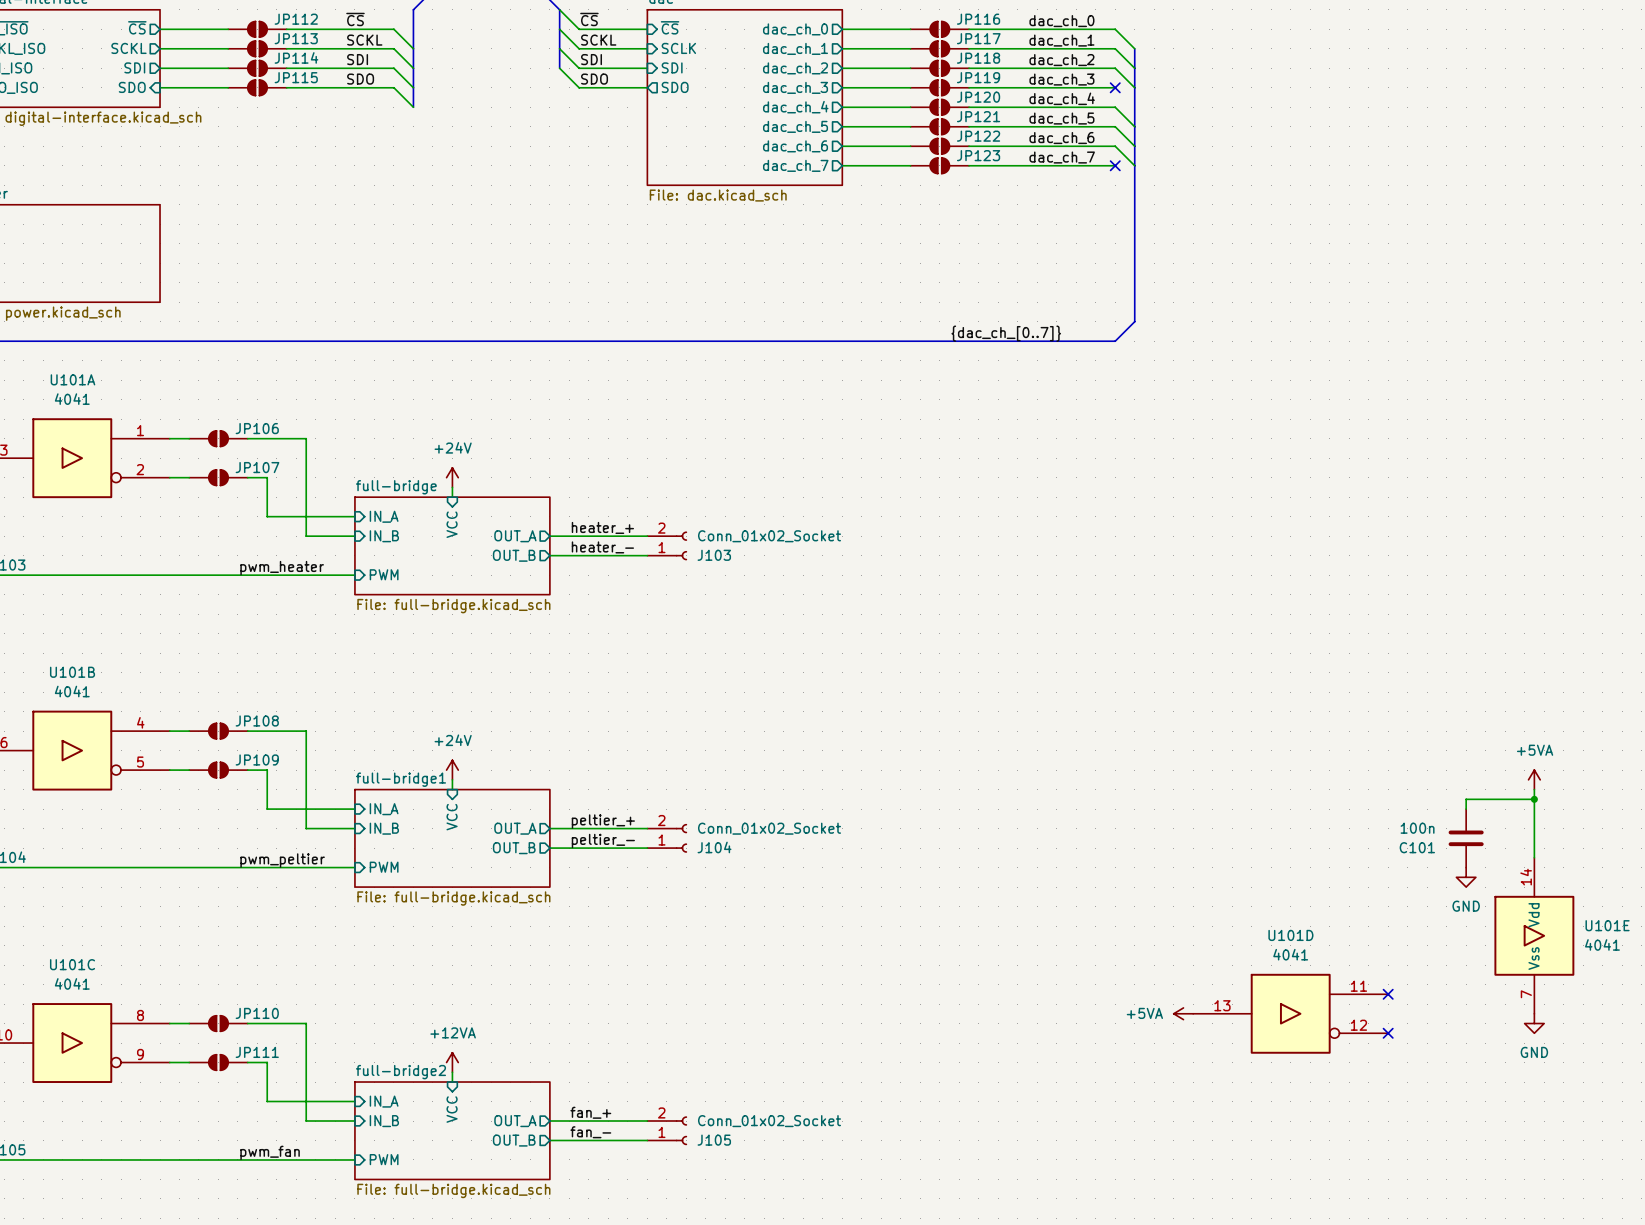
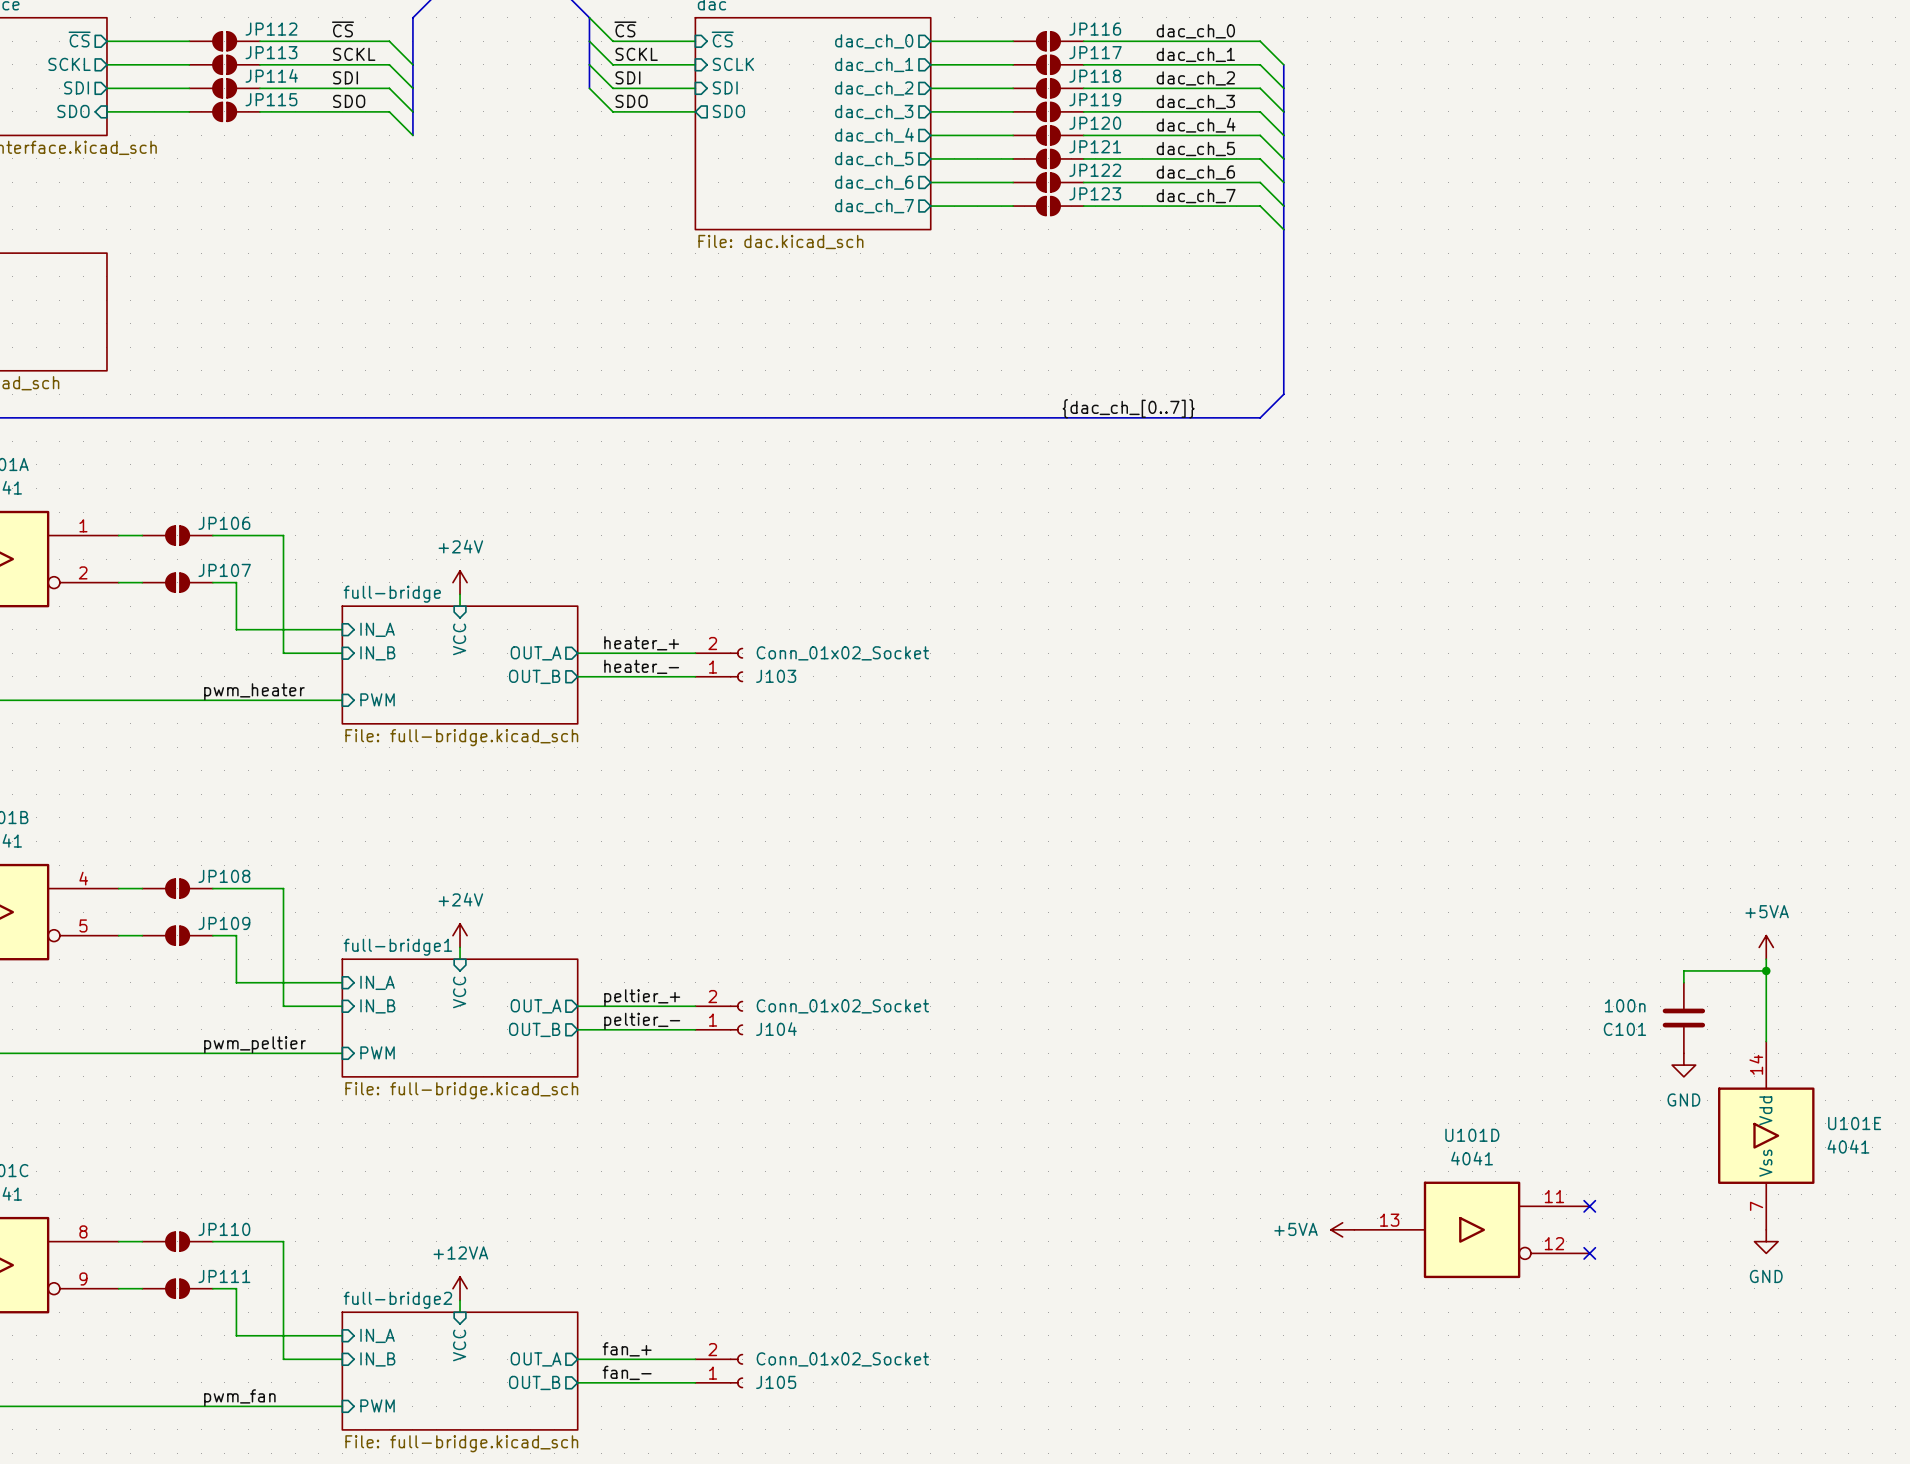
wire: none -> (1260, 111) (1283, 135)
no-connect mark: (1115, 87) -> none
wire: none -> (1260, 206) (1283, 229)
no-connect mark: (1115, 165) -> none

